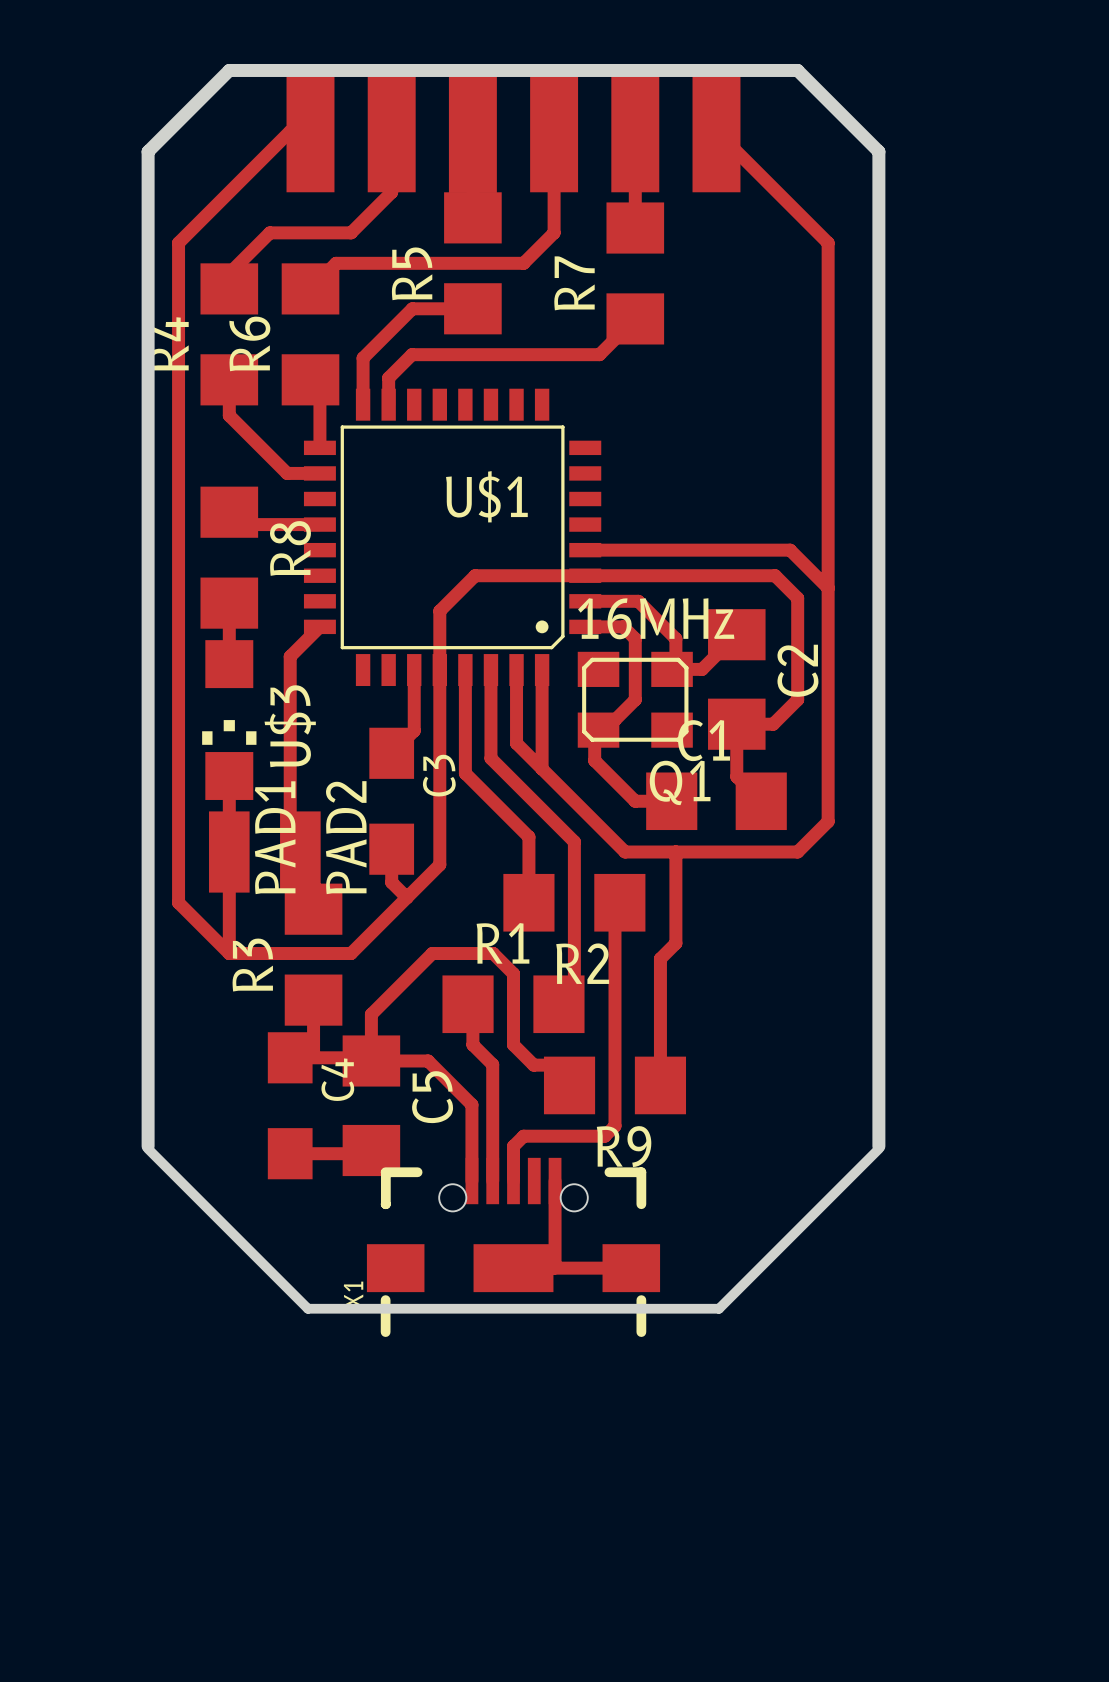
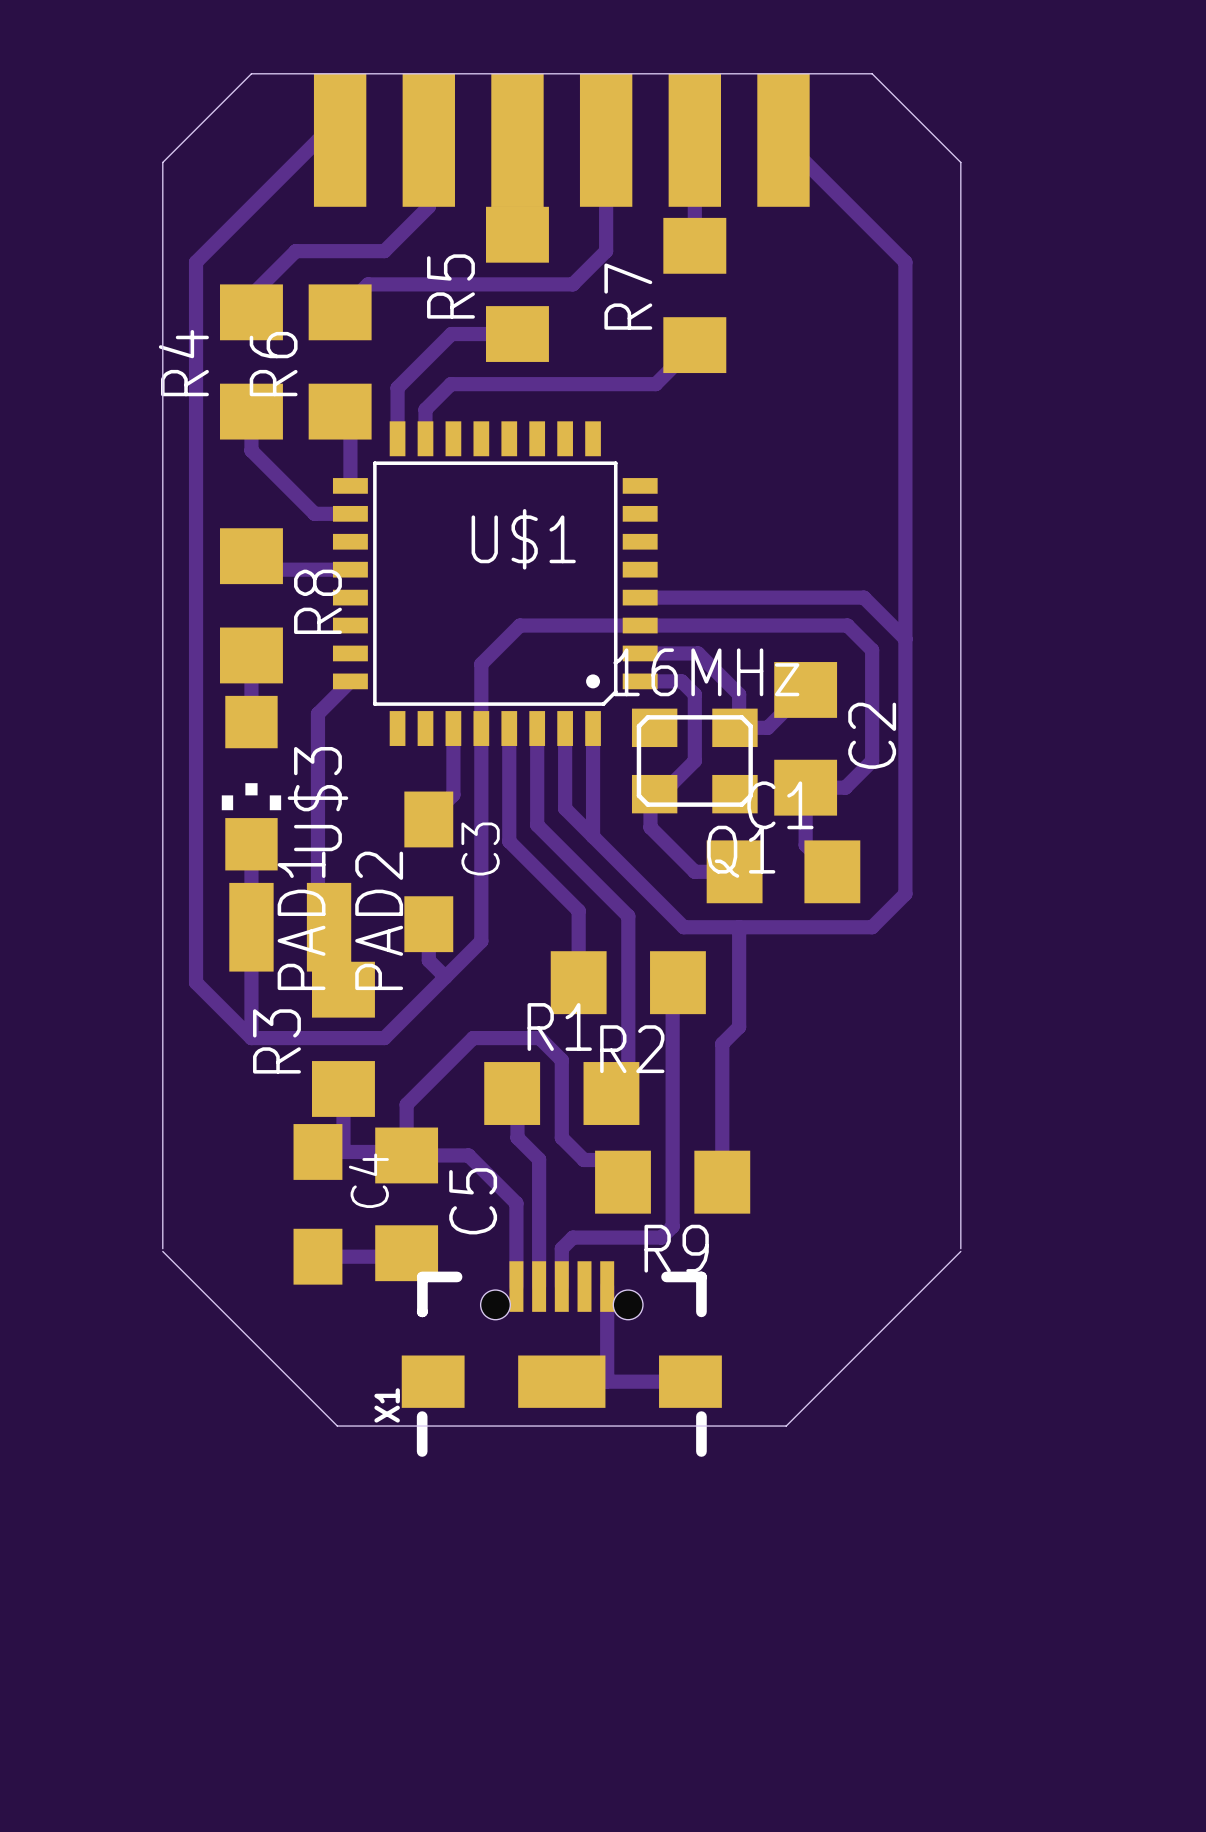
board edge width: thick (148, 1146) (148, 151) (229, 70) (797, 70) (878, 151) (878, 1146) -> thin (162, 1248) (162, 162) (251, 73) (872, 73) (960, 162) (960, 1248)
board edge width: thick (148, 1148) (307, 1308) (719, 1308) (878, 1148) -> thin (162, 1251) (337, 1426) (786, 1426) (960, 1251)

